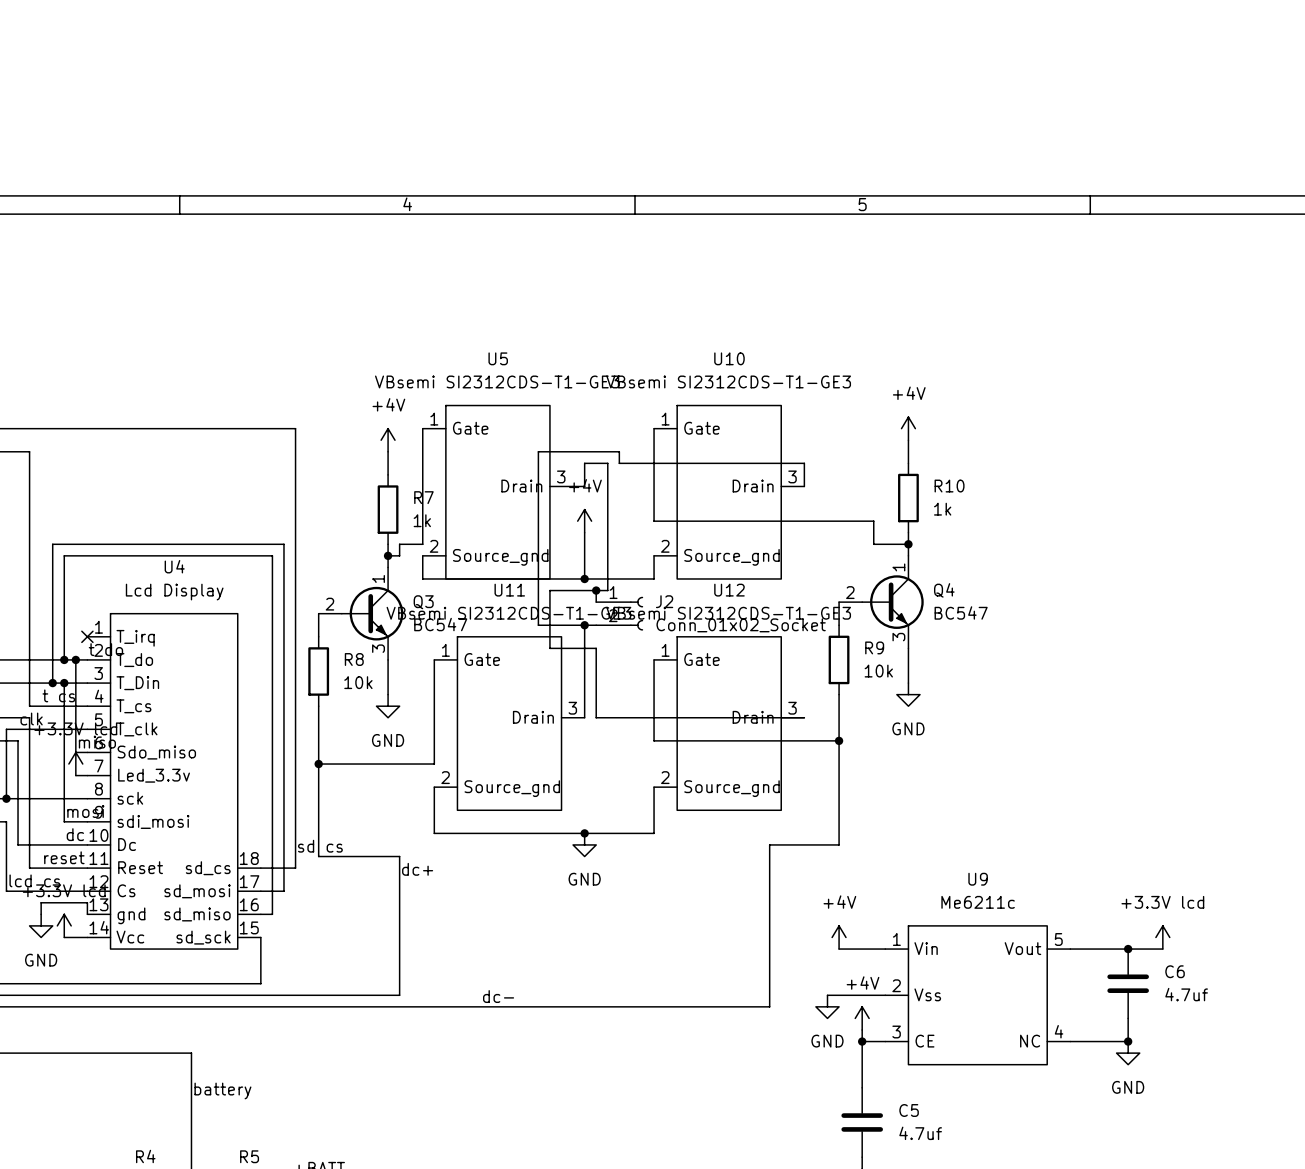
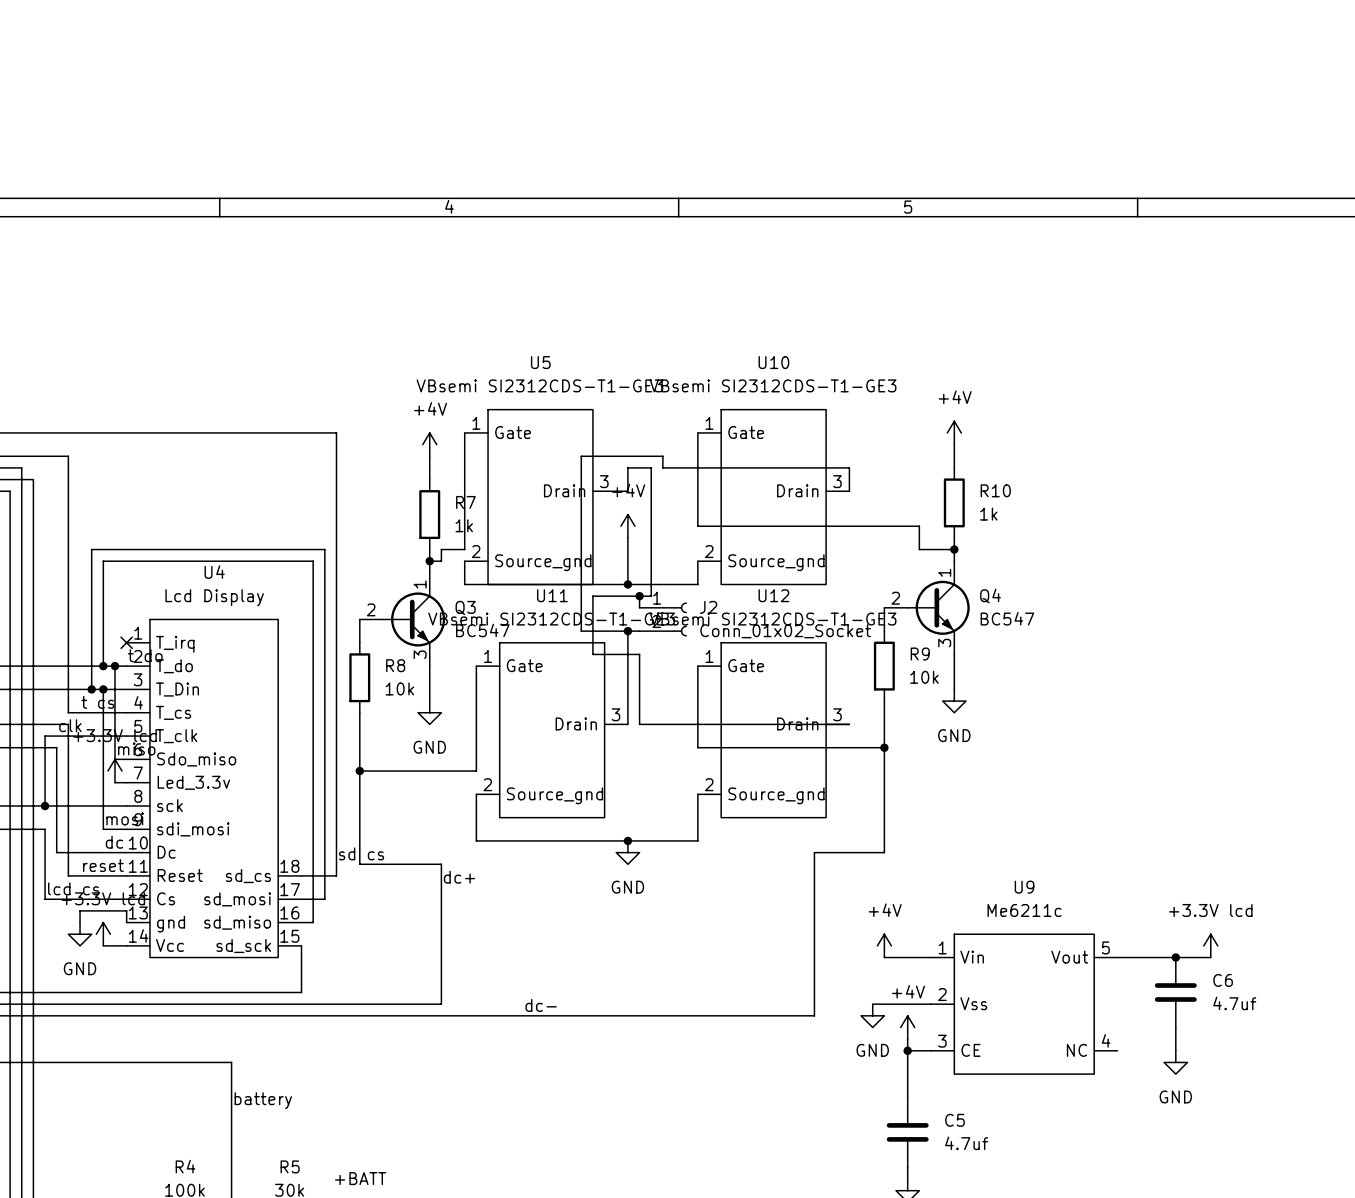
wire: (1070, 1041) (1128, 1041) -> none
junction: (1128, 1041) -> none

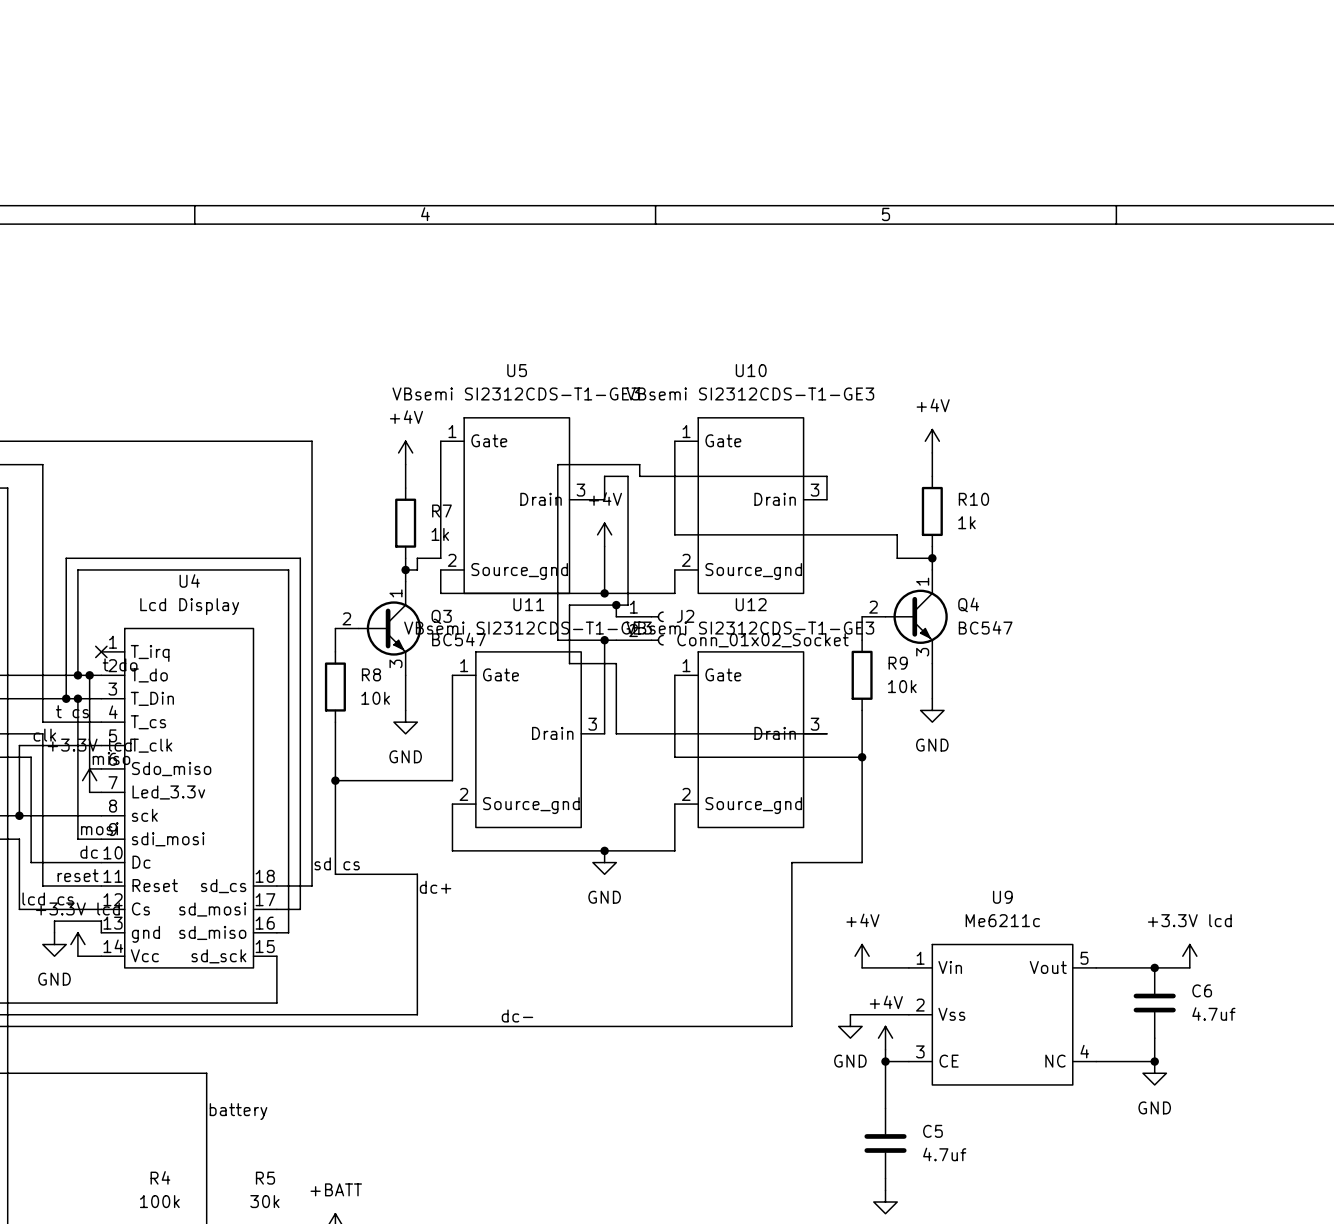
wire: none -> (1096, 1061) (1154, 1061)
junction: none -> (1154, 1061)

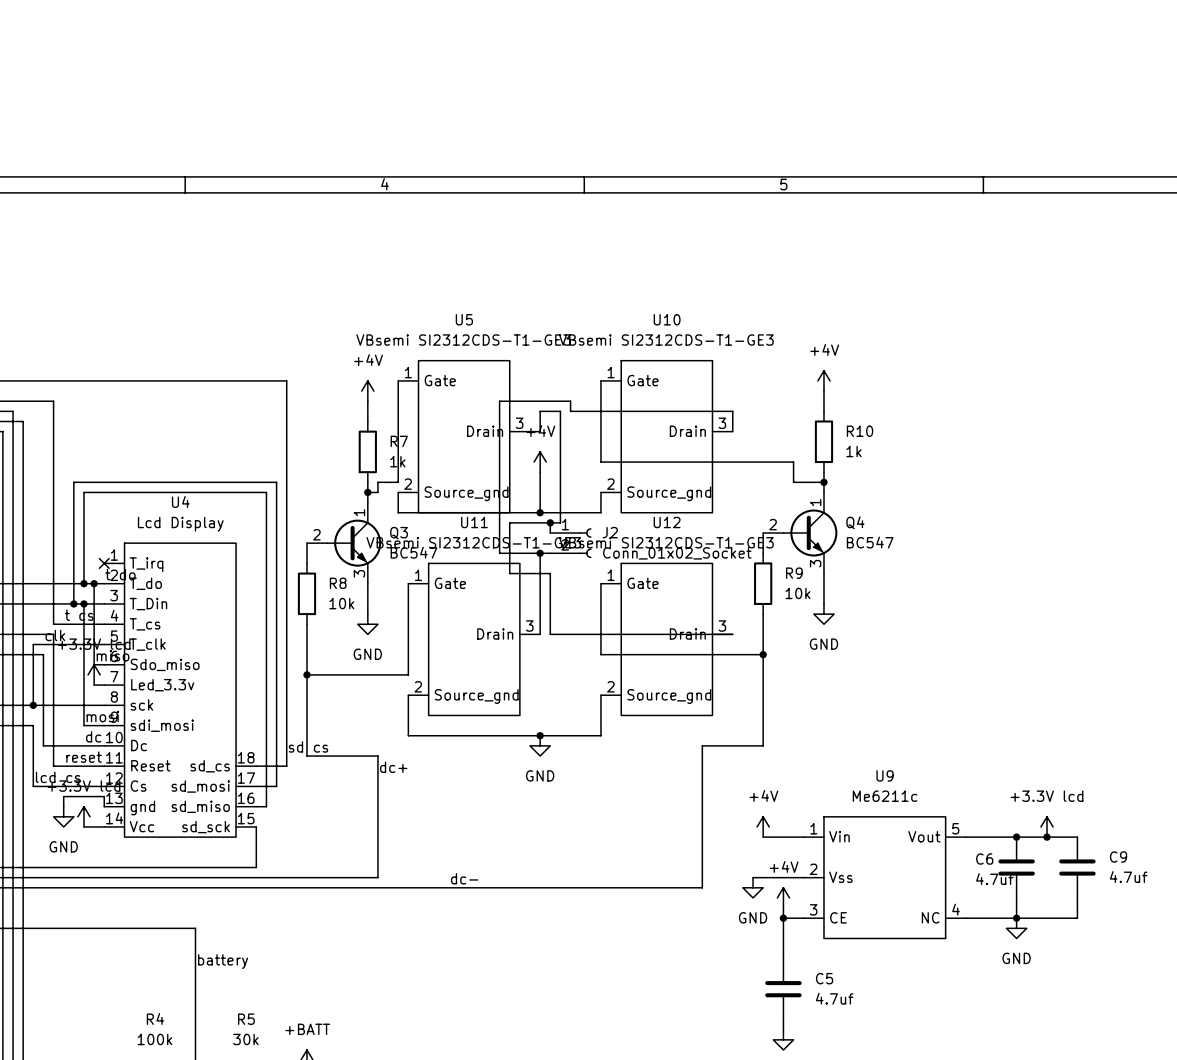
wire: none -> (1047, 837) (1077, 837)
junction: none -> (1047, 837)
C6 name position: C6 (1202, 990) -> C6 (984, 859)
C9: none -> 4.7uf (1077, 867)
C6 value position: 4.7uf (1213, 1014) -> 4.7uf (994, 879)
wire: none -> (1077, 897) (1077, 918) (1016, 918)

